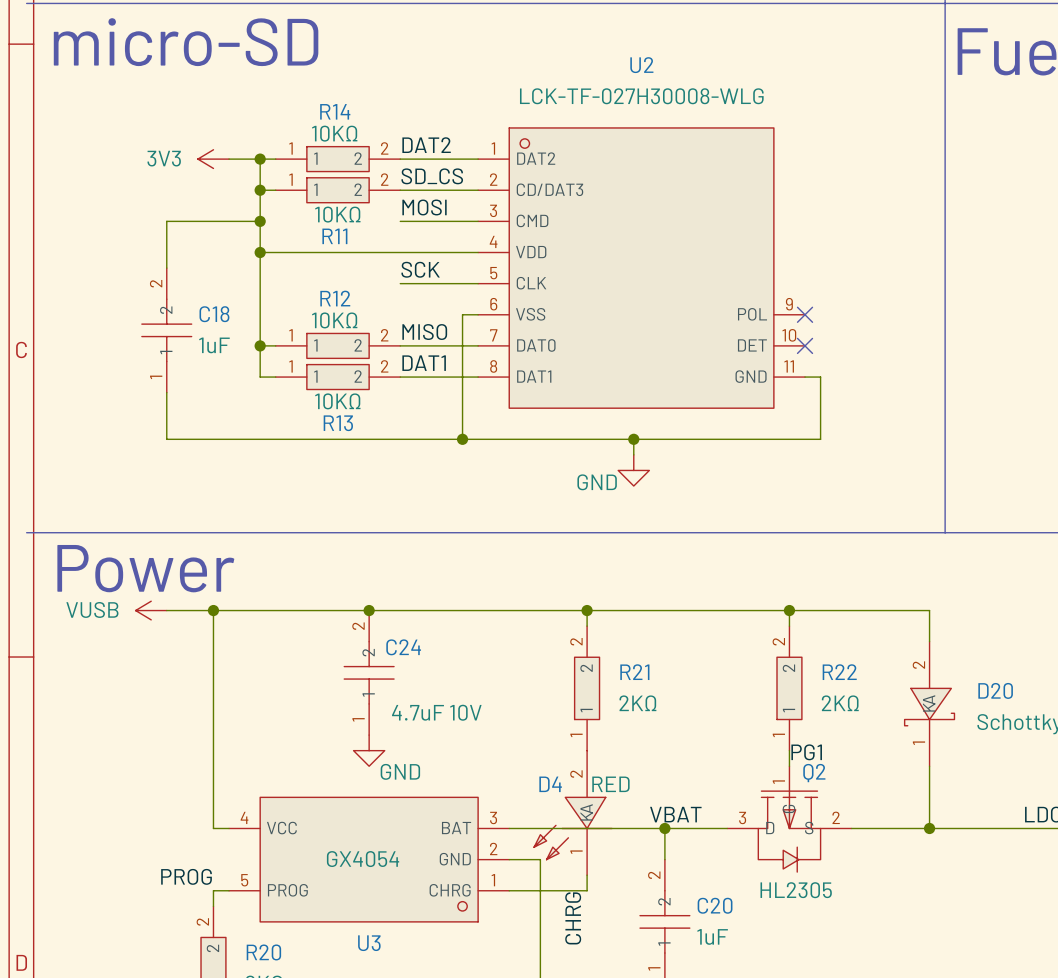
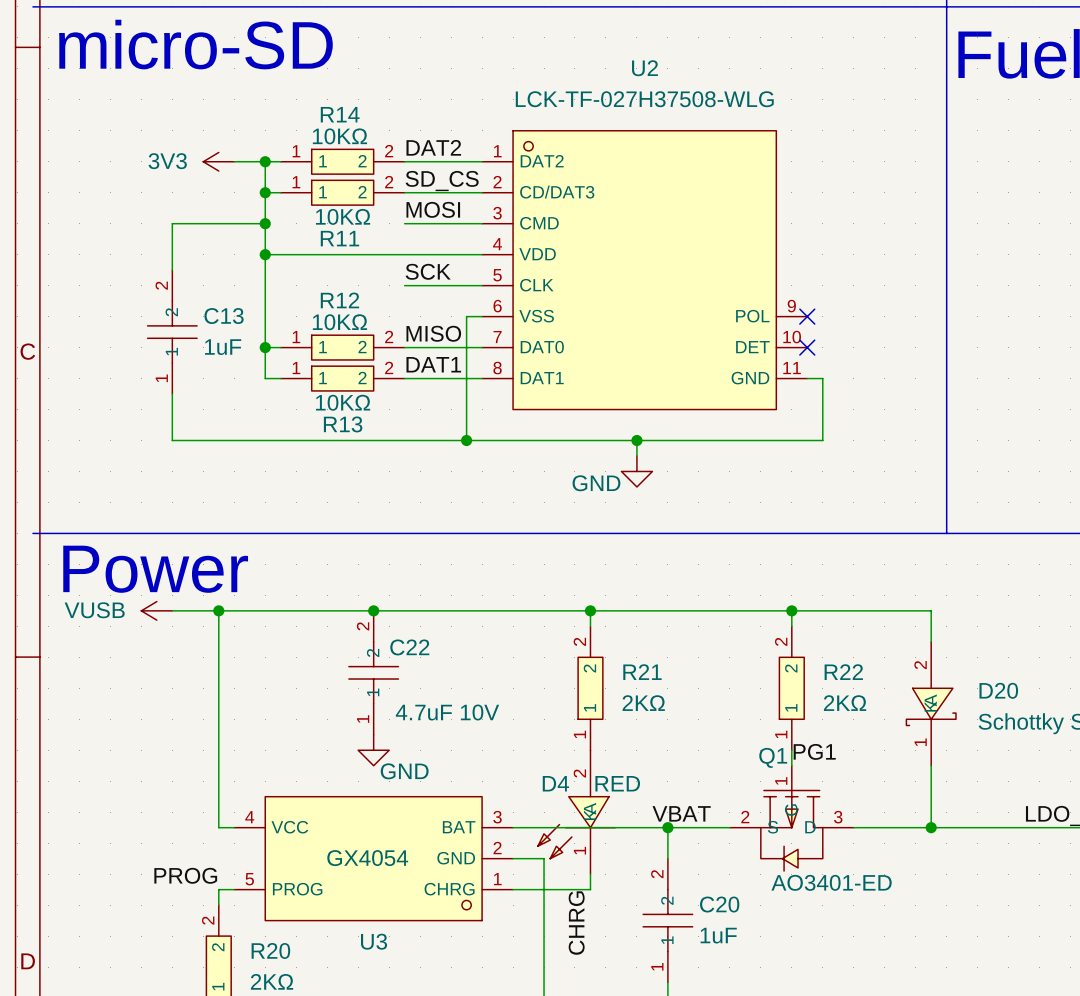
U2 value: LCK-TF-027H30008-WLG (641, 96) -> LCK-TF-027H37508-WLG (644, 99)
C18 name: C18 (214, 314) -> C13 (224, 316)
C24 name: C24 (403, 647) -> C22 (409, 647)
Q2: HL2305 (789, 819) -> none
Q1: none -> AO3401-ED (791, 818)

